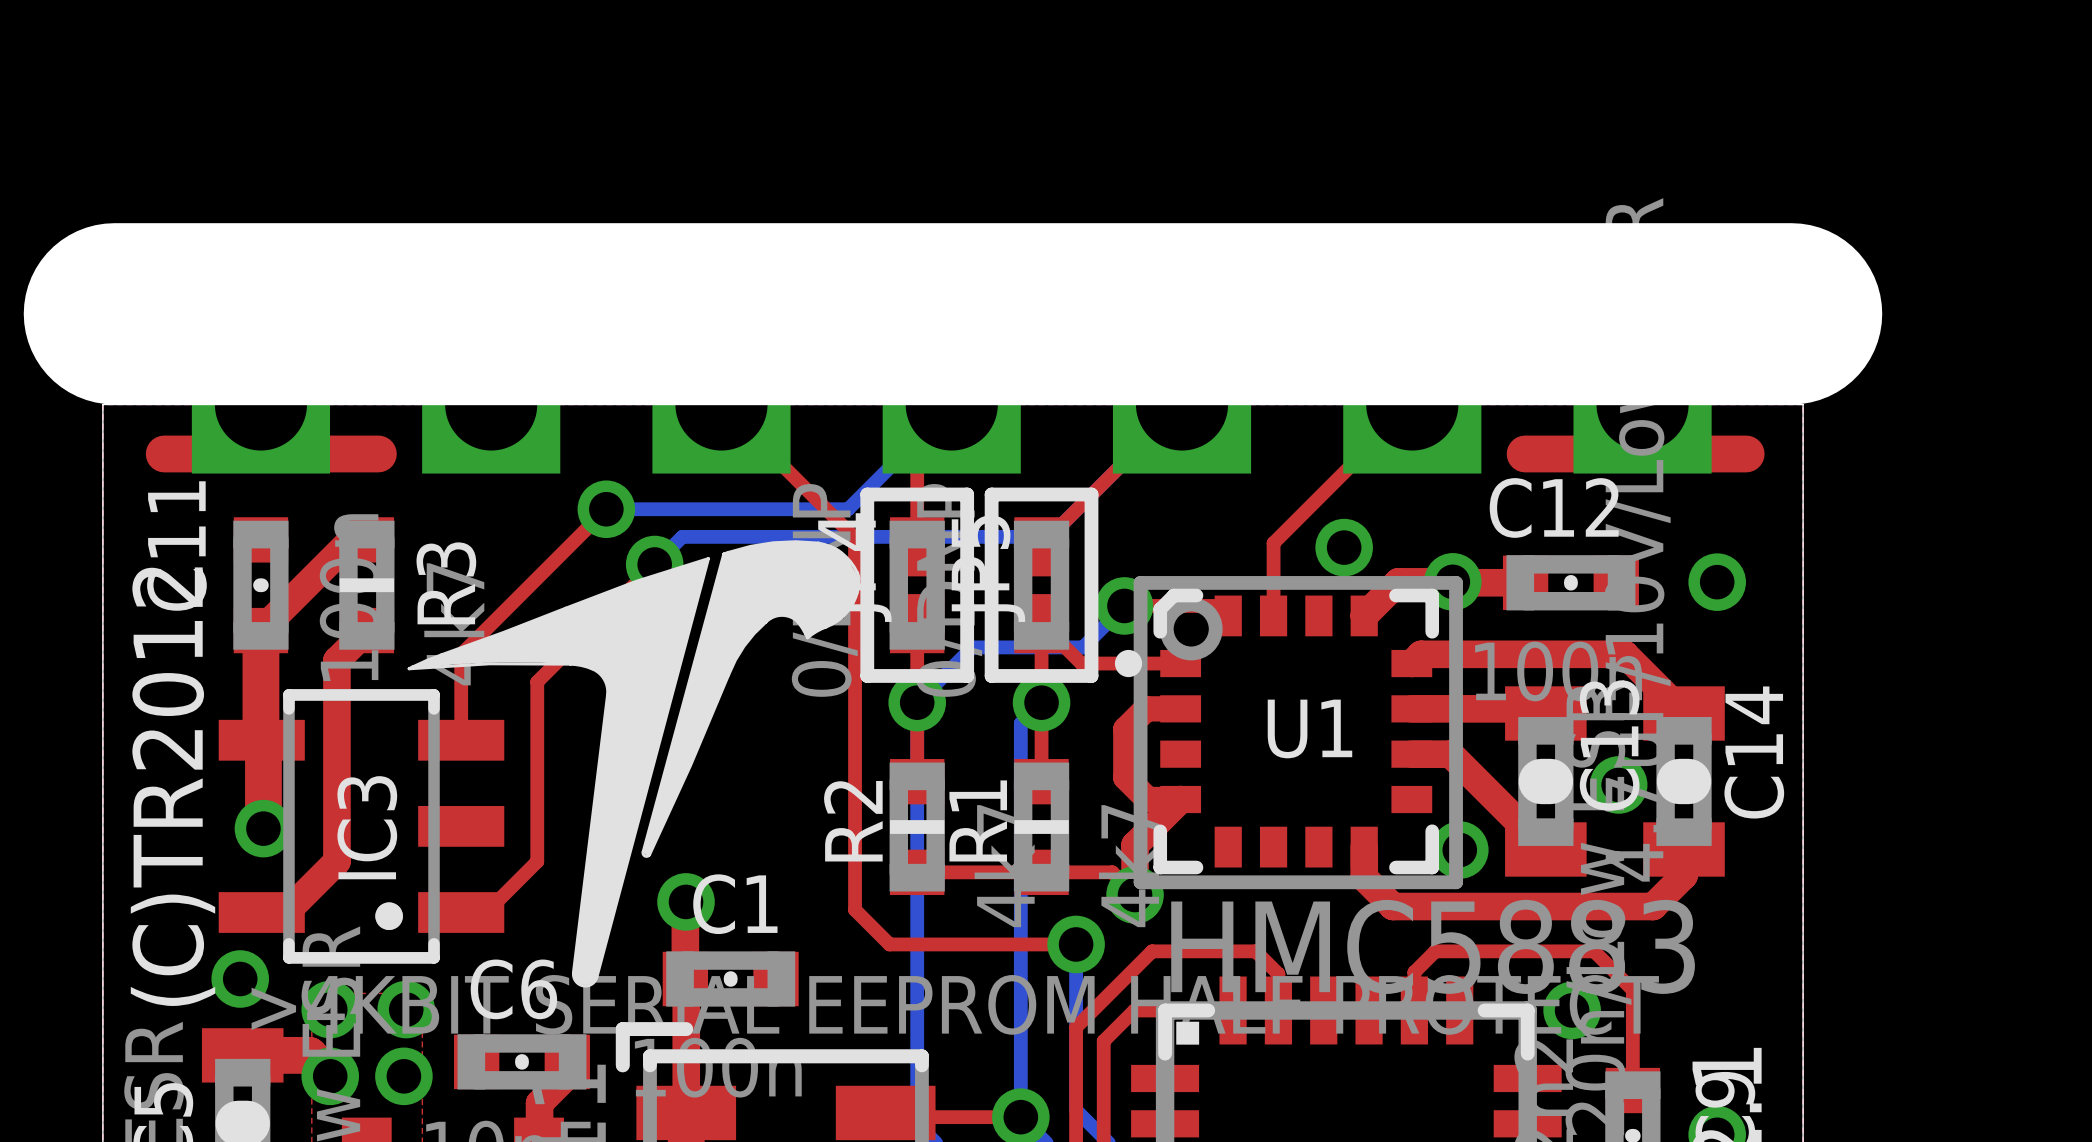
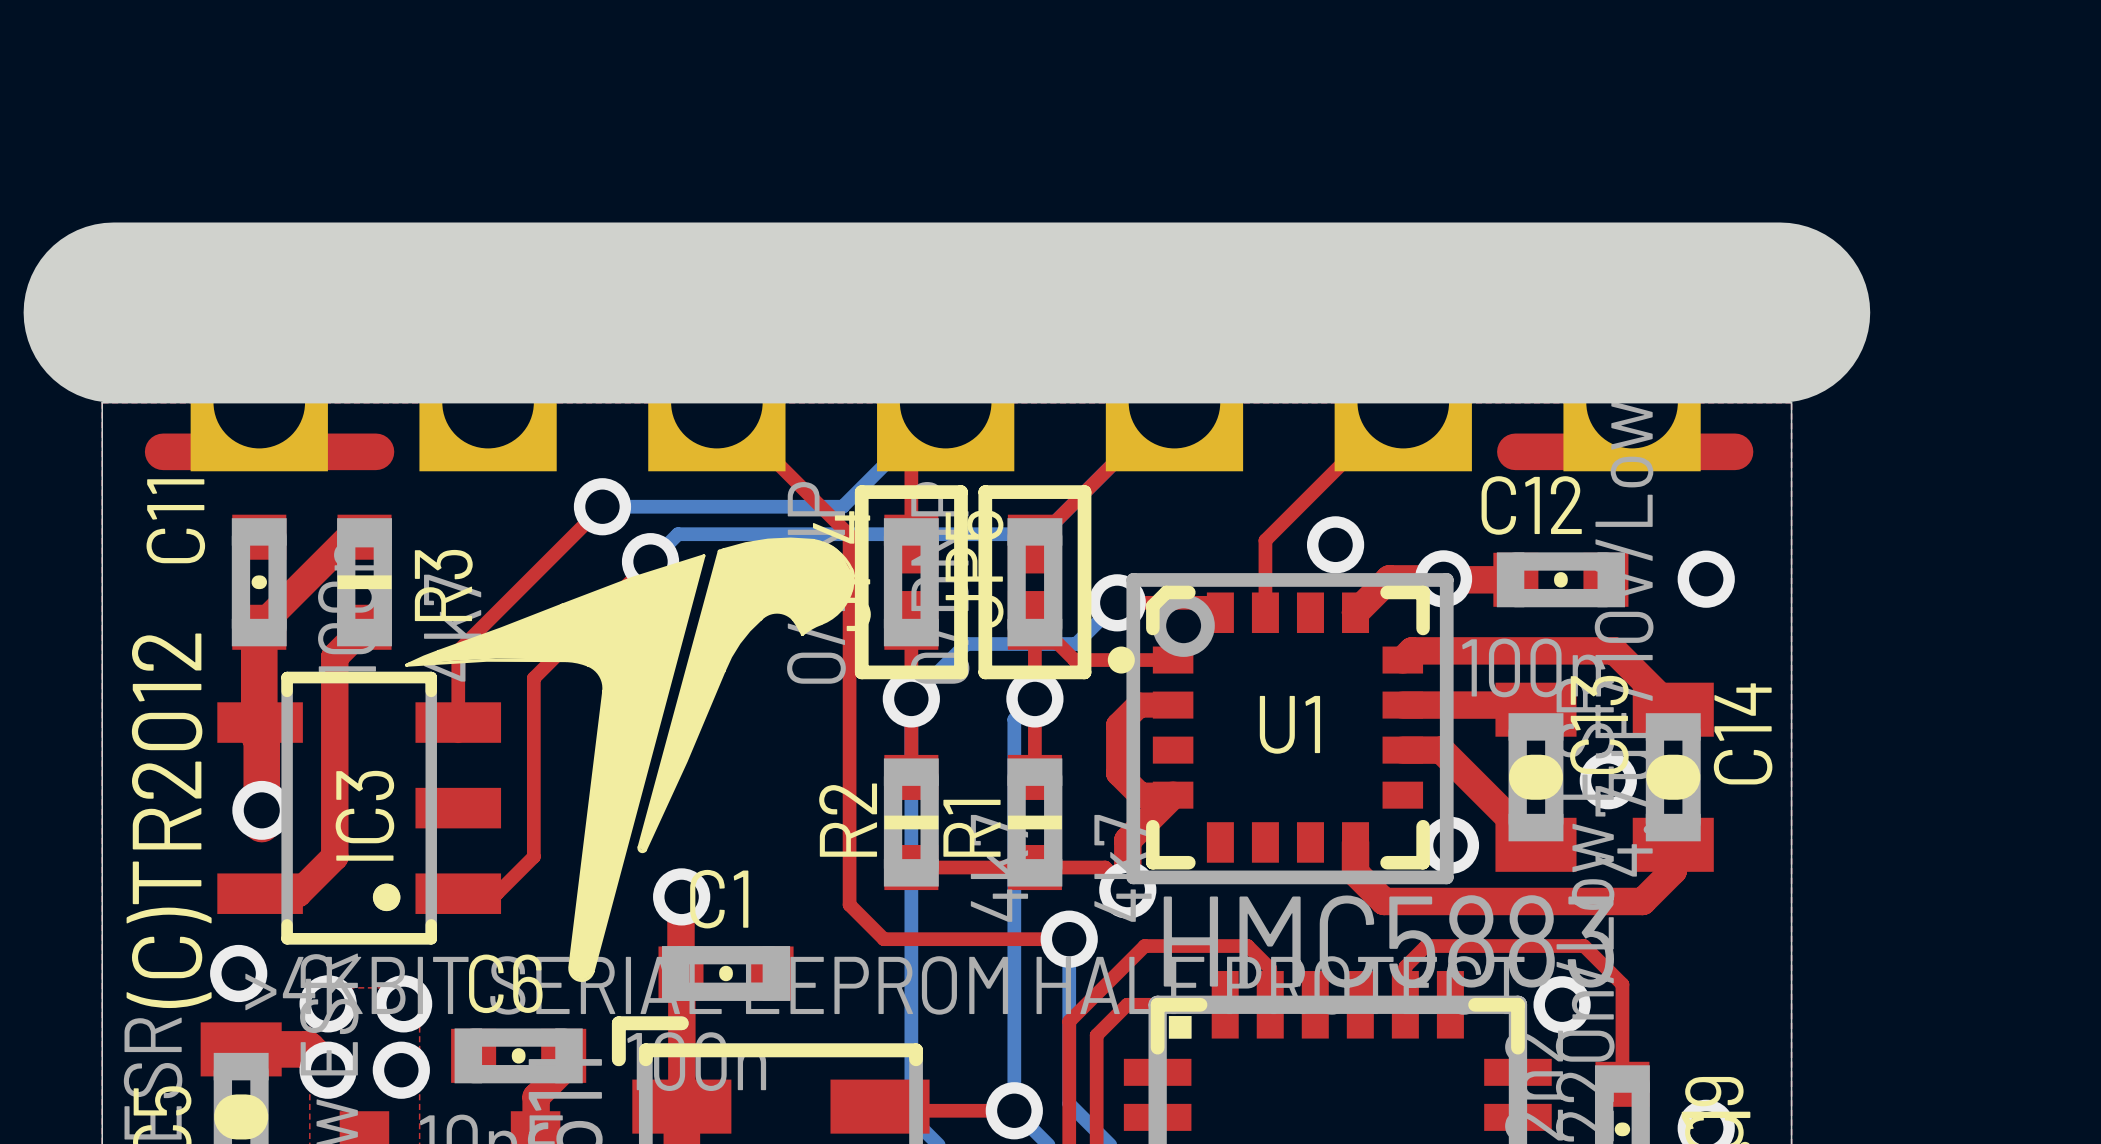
IC3 position: (361, 826) -> (359, 808)
via position: (263, 828) -> (261, 810)

